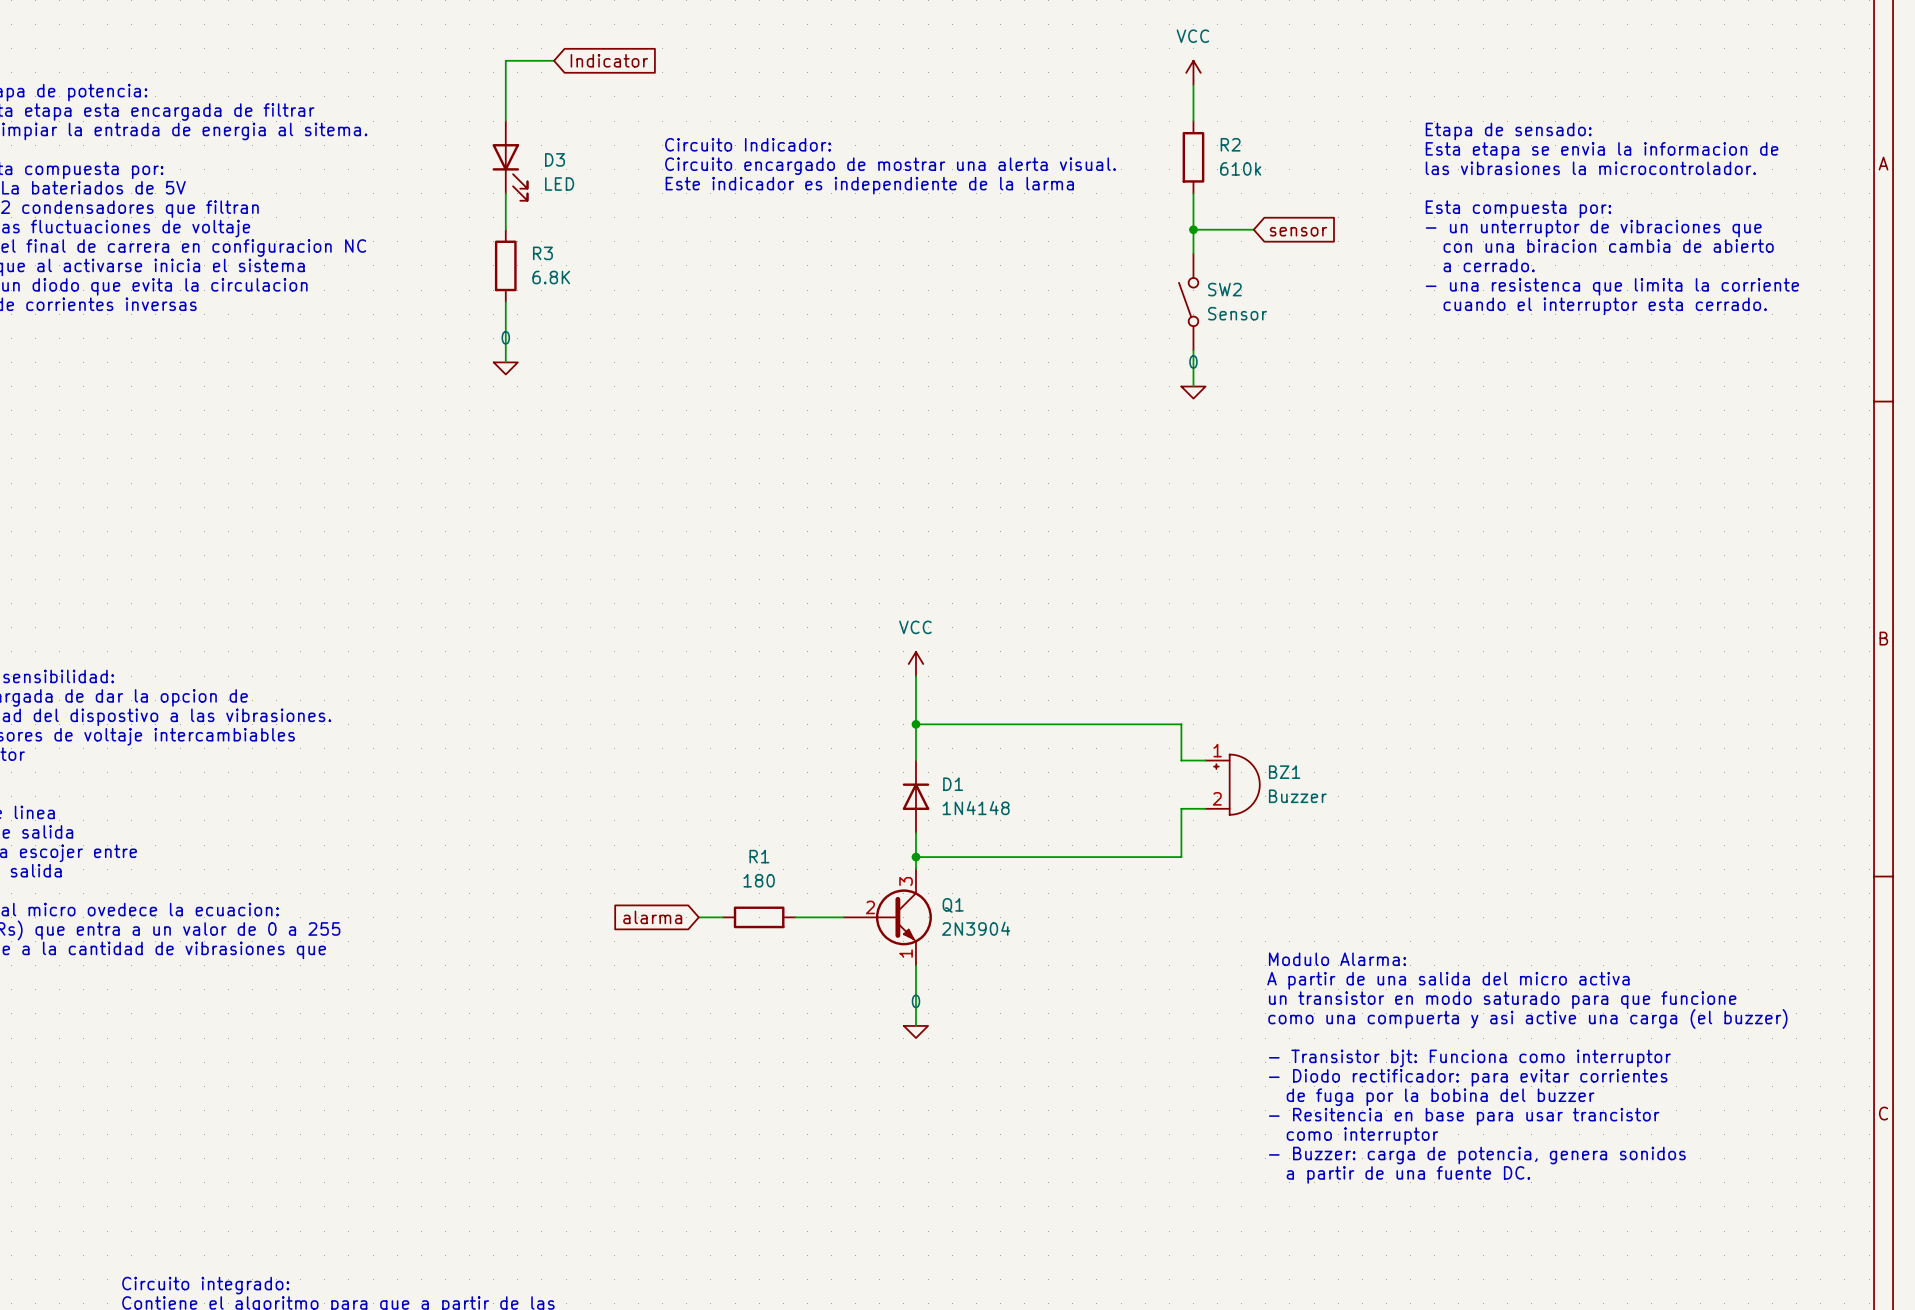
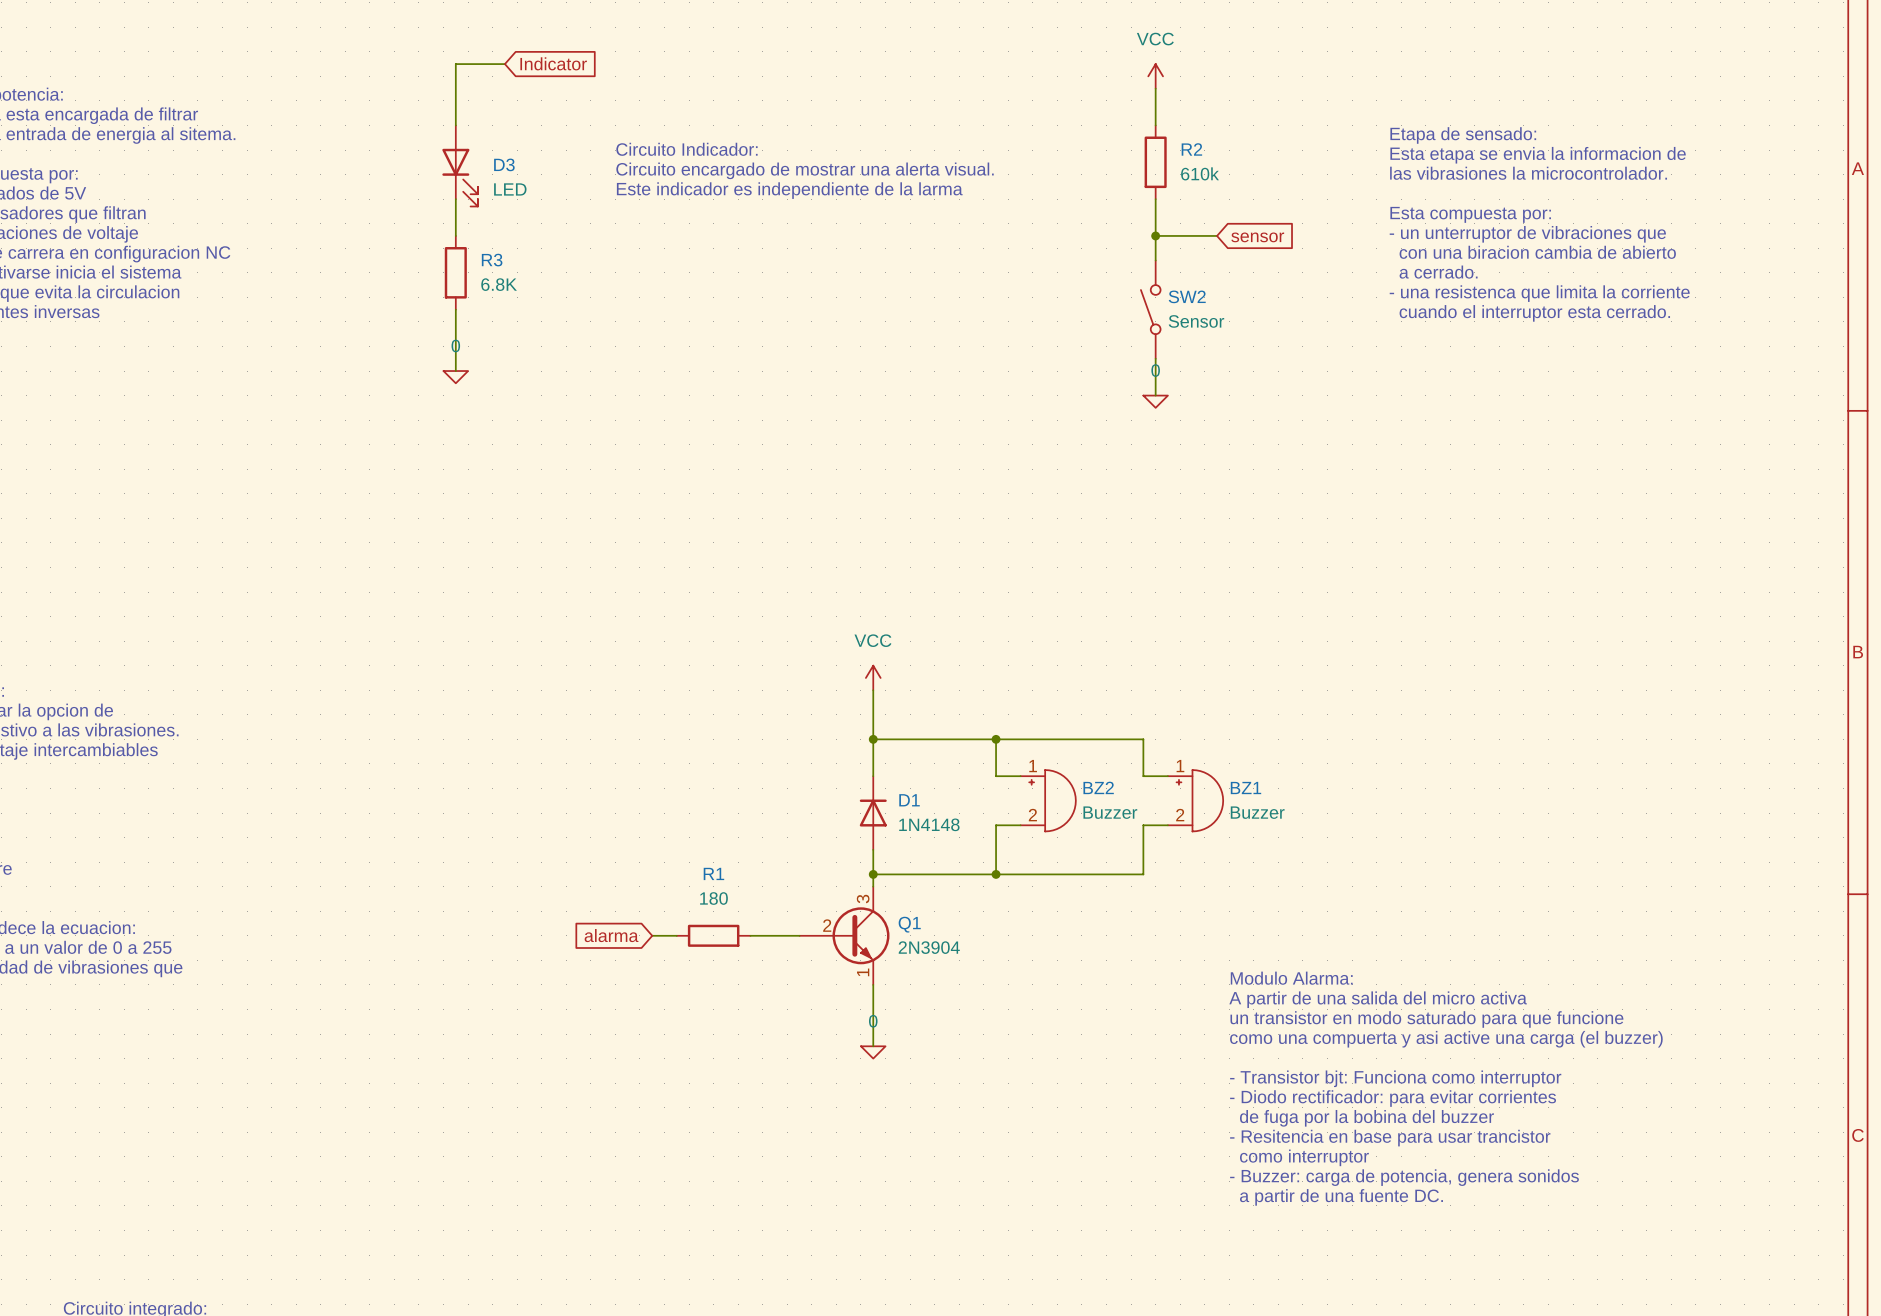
wire: none -> (996, 739) (996, 776) (1020, 776)
junction: none -> (996, 739)
BZ2: none -> Buzzer (1048, 800)
wire: none -> (1020, 825) (996, 825) (996, 874)
junction: none -> (996, 874)

